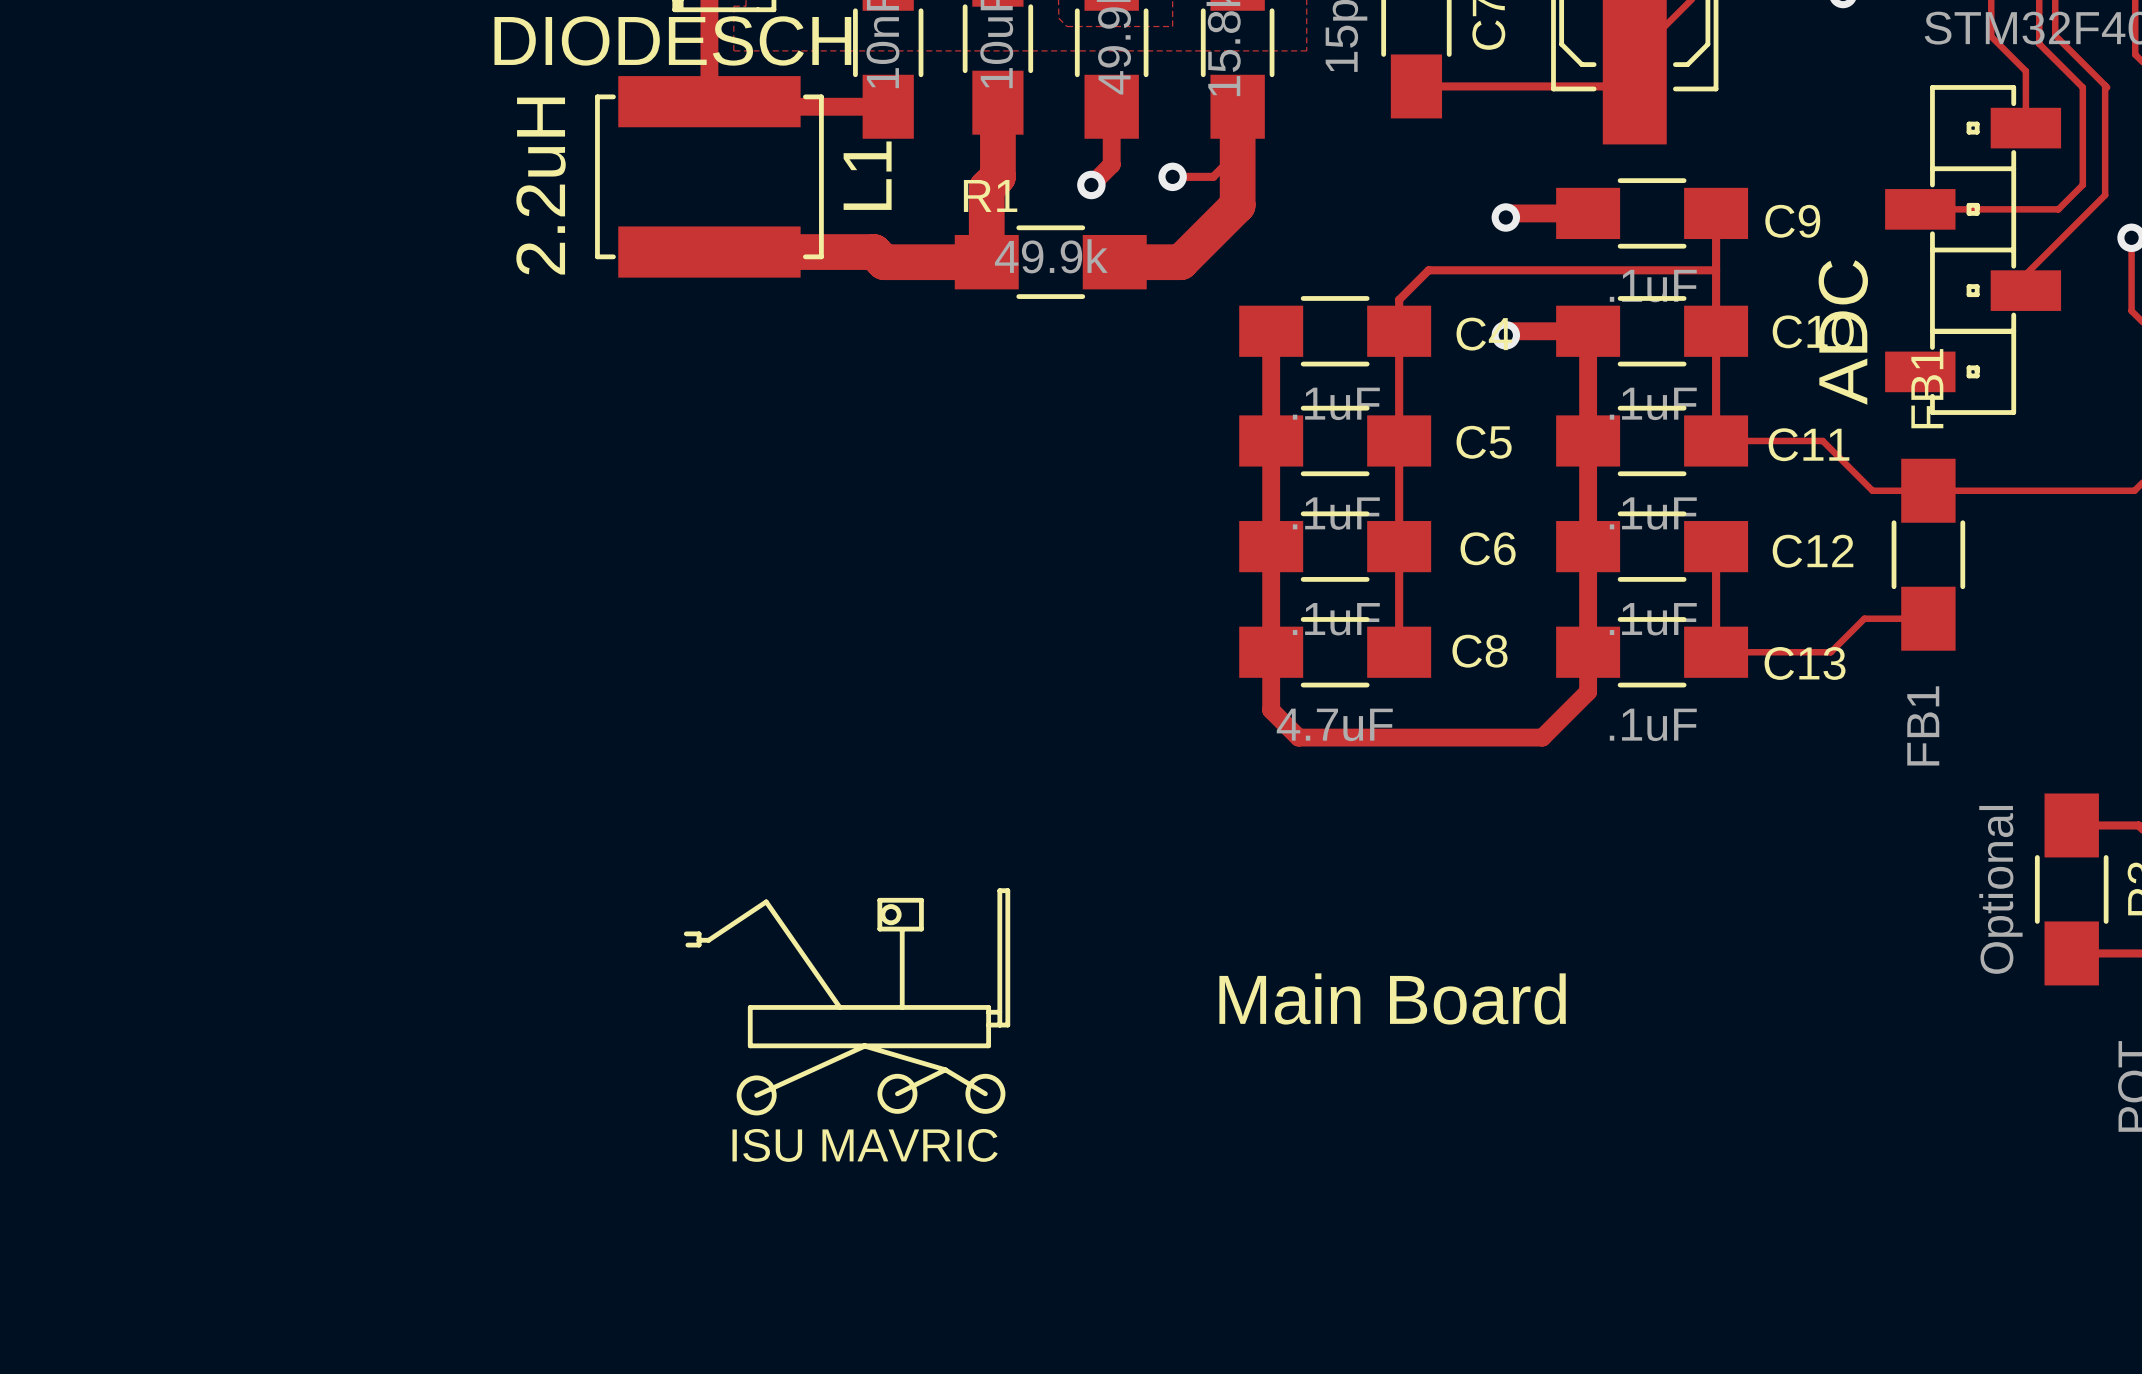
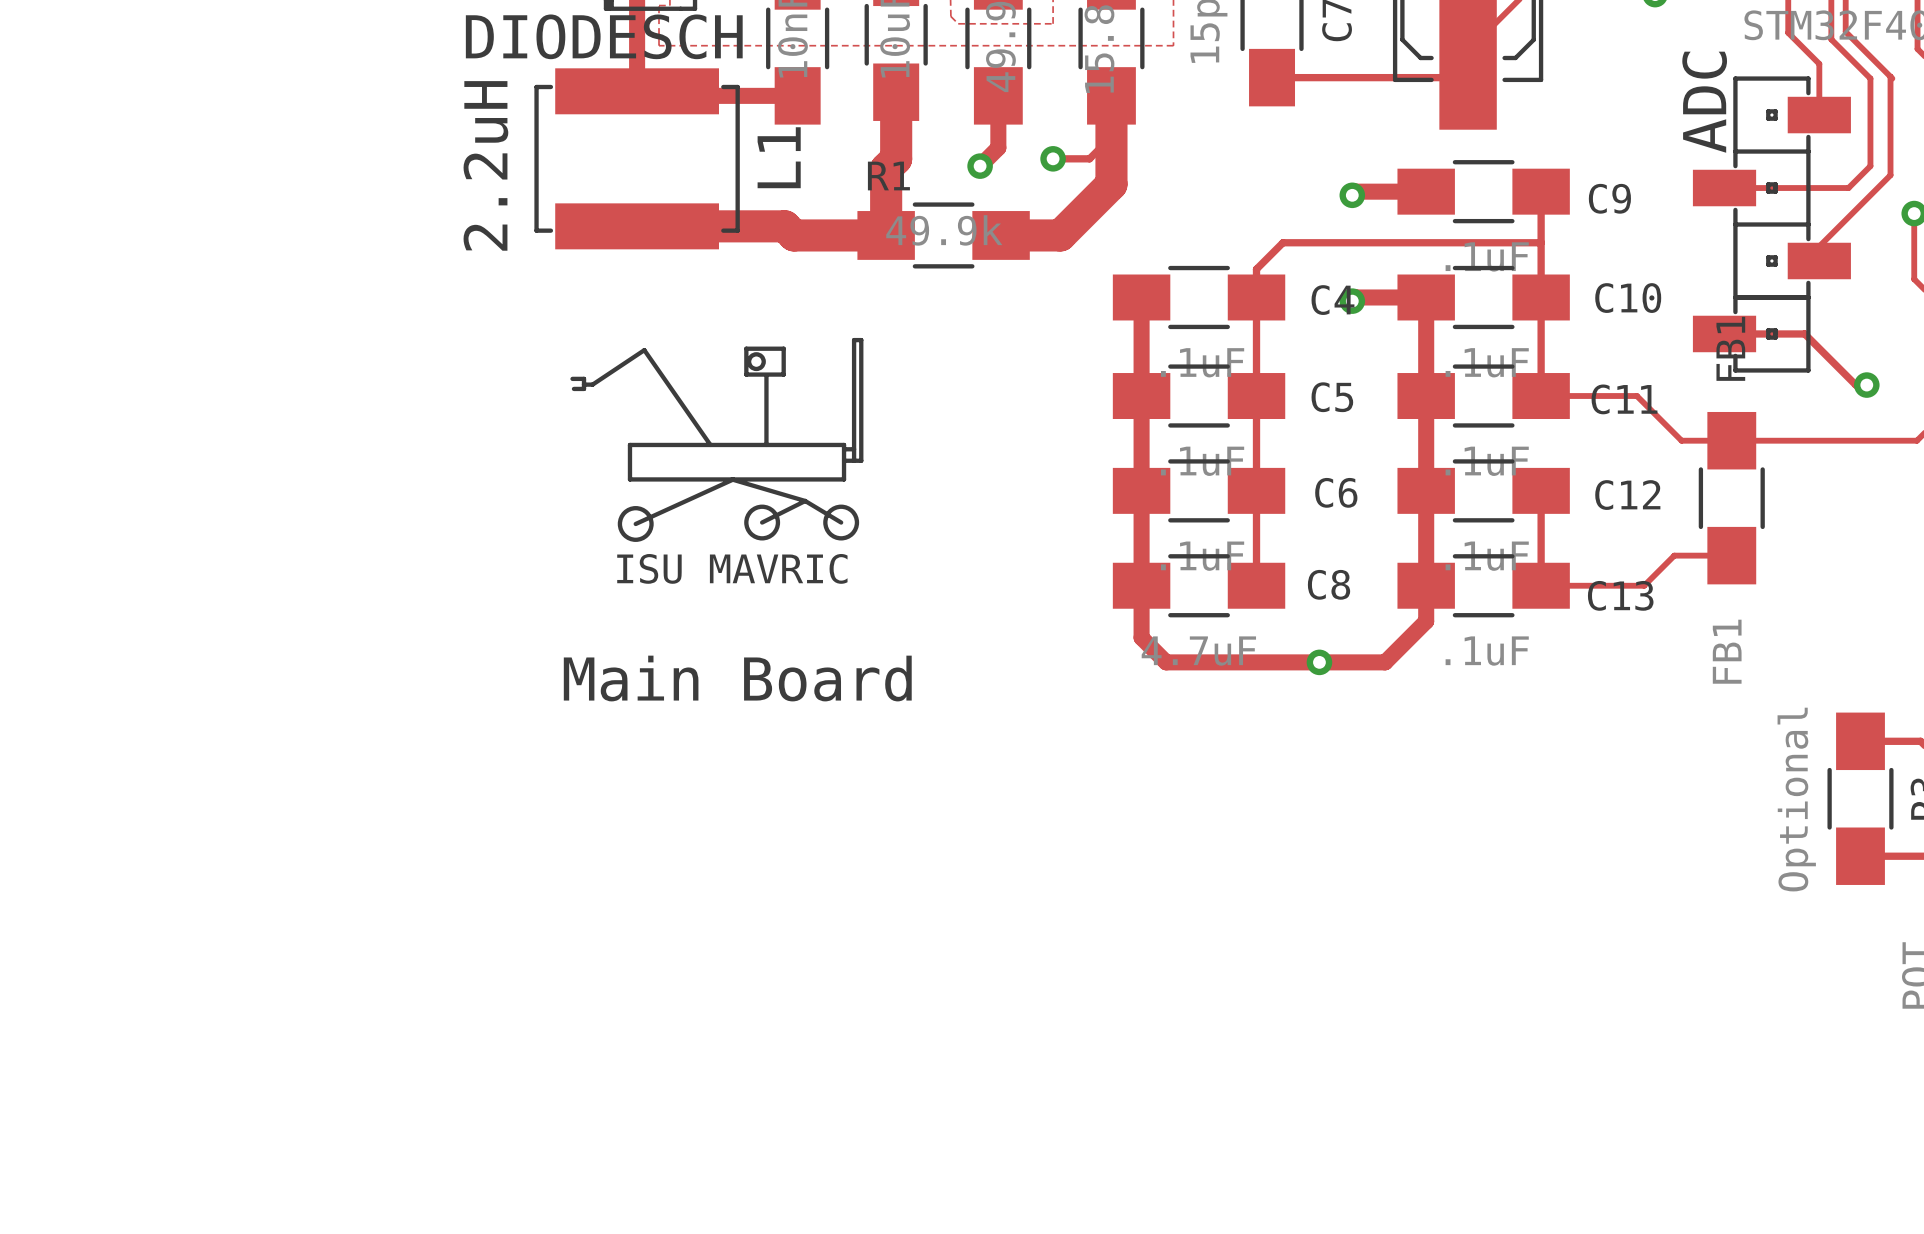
part value position: ADC (1843, 332) -> ADC (1704, 102)
track: none -> (1724, 333) (1804, 333) (1855, 385) (1866, 385)
via: none -> (1866, 385)
via: none -> (1319, 662)
text position: Main Board (1392, 998) -> Main Board (737, 678)
ISU MAVRIC position: (847, 1001) -> (716, 439)

